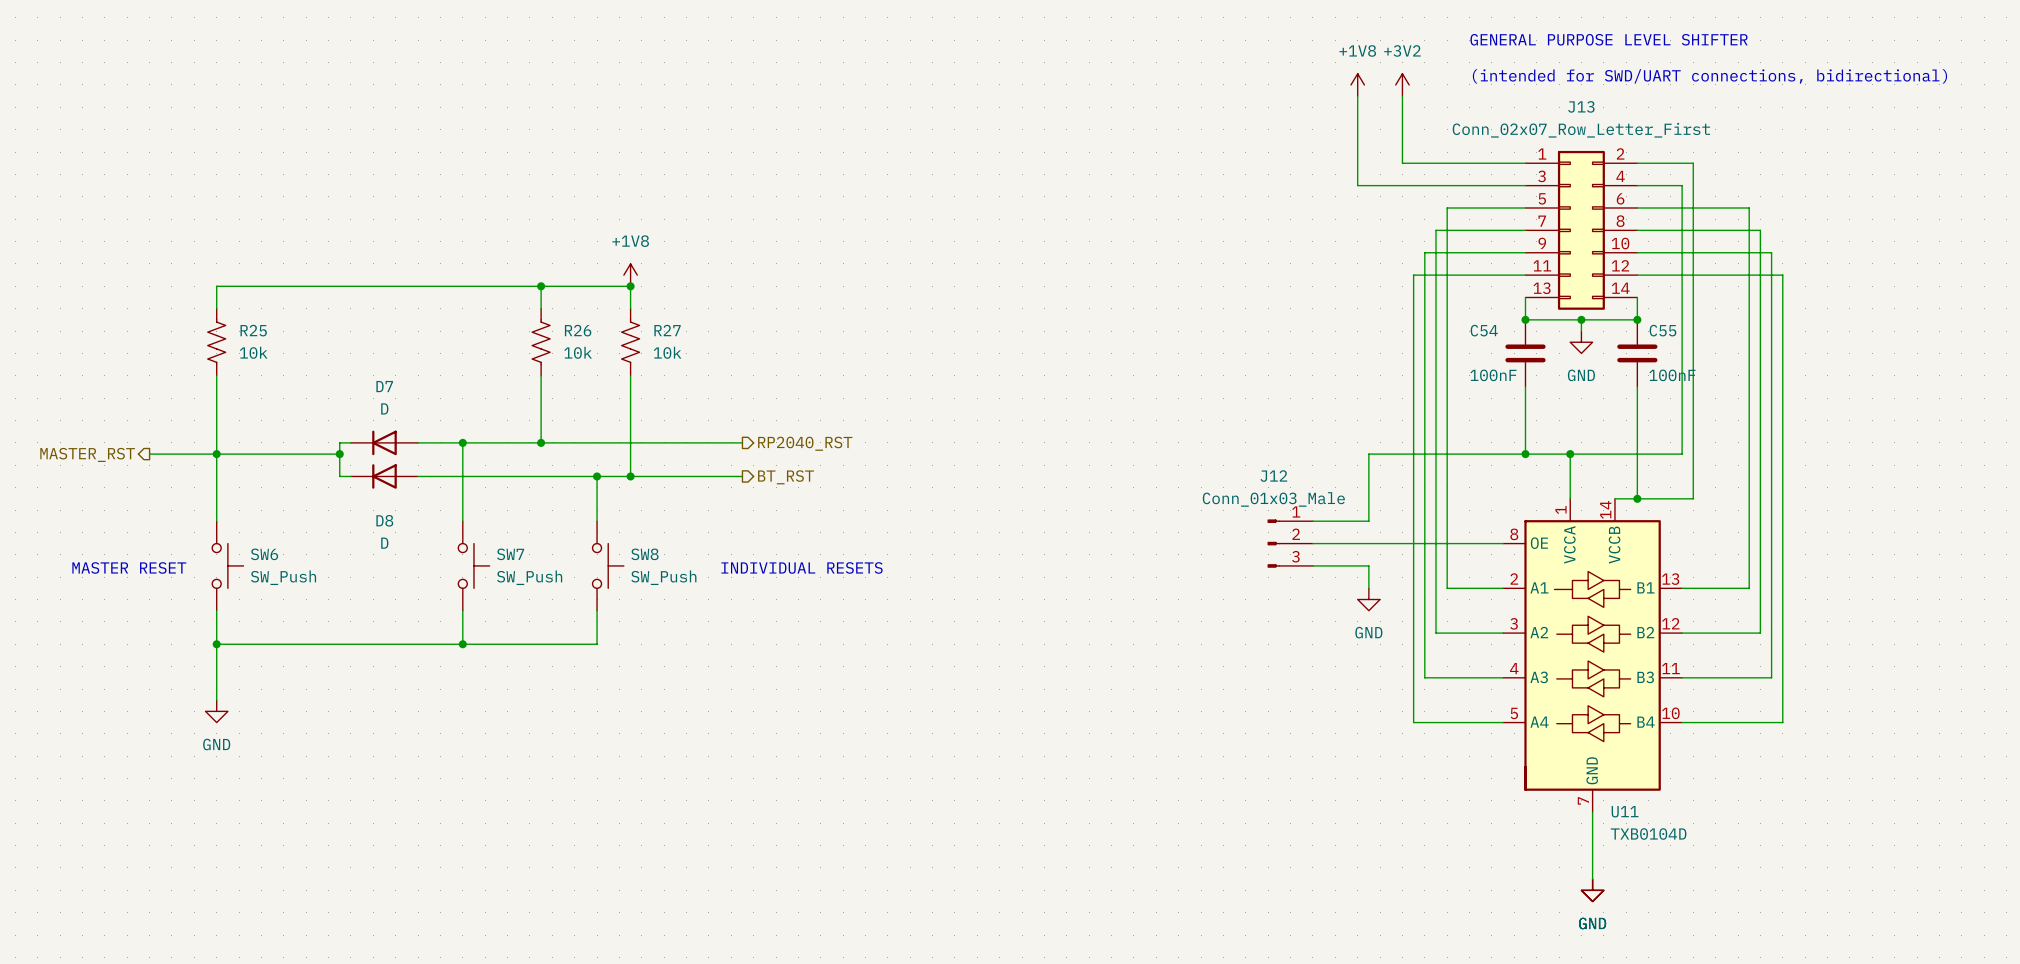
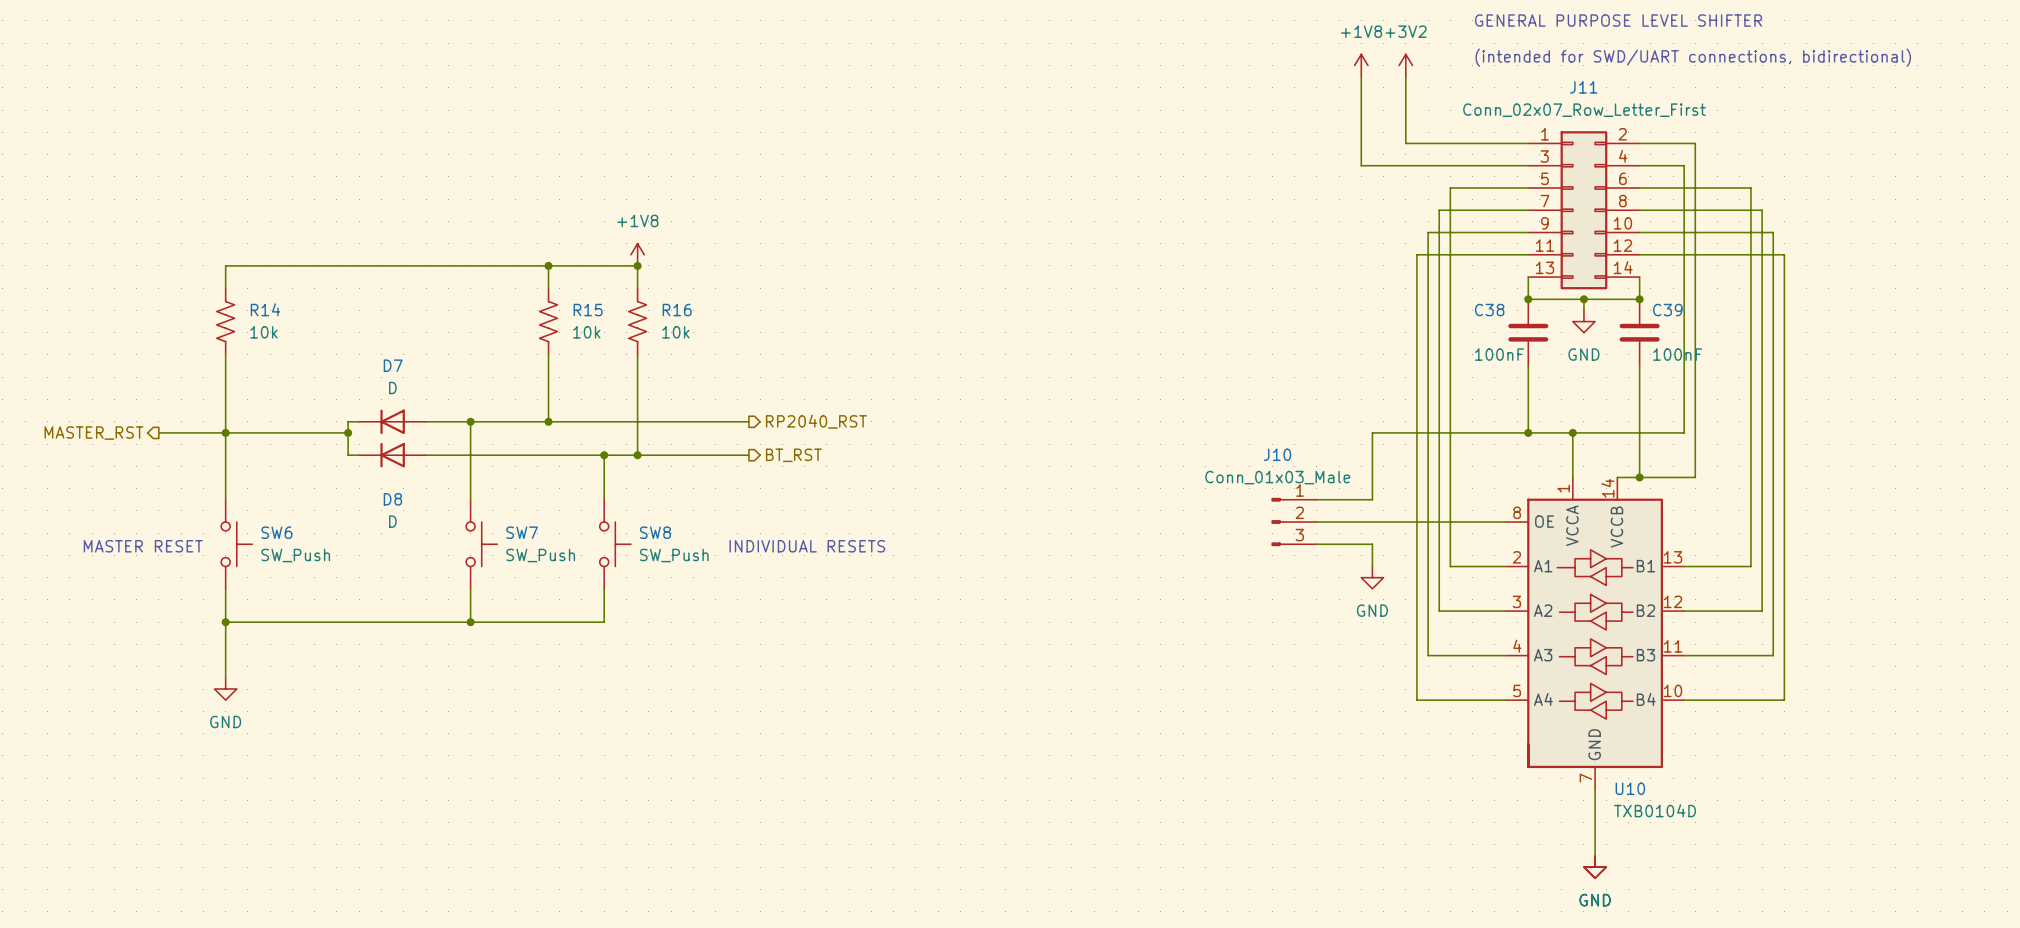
J13 name: J13 (1581, 106) -> J11 (1583, 87)
R25 name: R25 (253, 330) -> R14 (265, 309)
R26 name: R26 (578, 330) -> R15 (588, 310)
R27 name: R27 (667, 330) -> R16 (677, 310)
C54 name: C54 (1484, 330) -> C38 (1489, 310)
C55 name: C55 (1662, 330) -> C39 (1667, 310)
J12 name: J12 (1273, 476) -> J10 (1277, 454)
U11 name: U11 (1625, 811) -> U10 (1630, 788)

